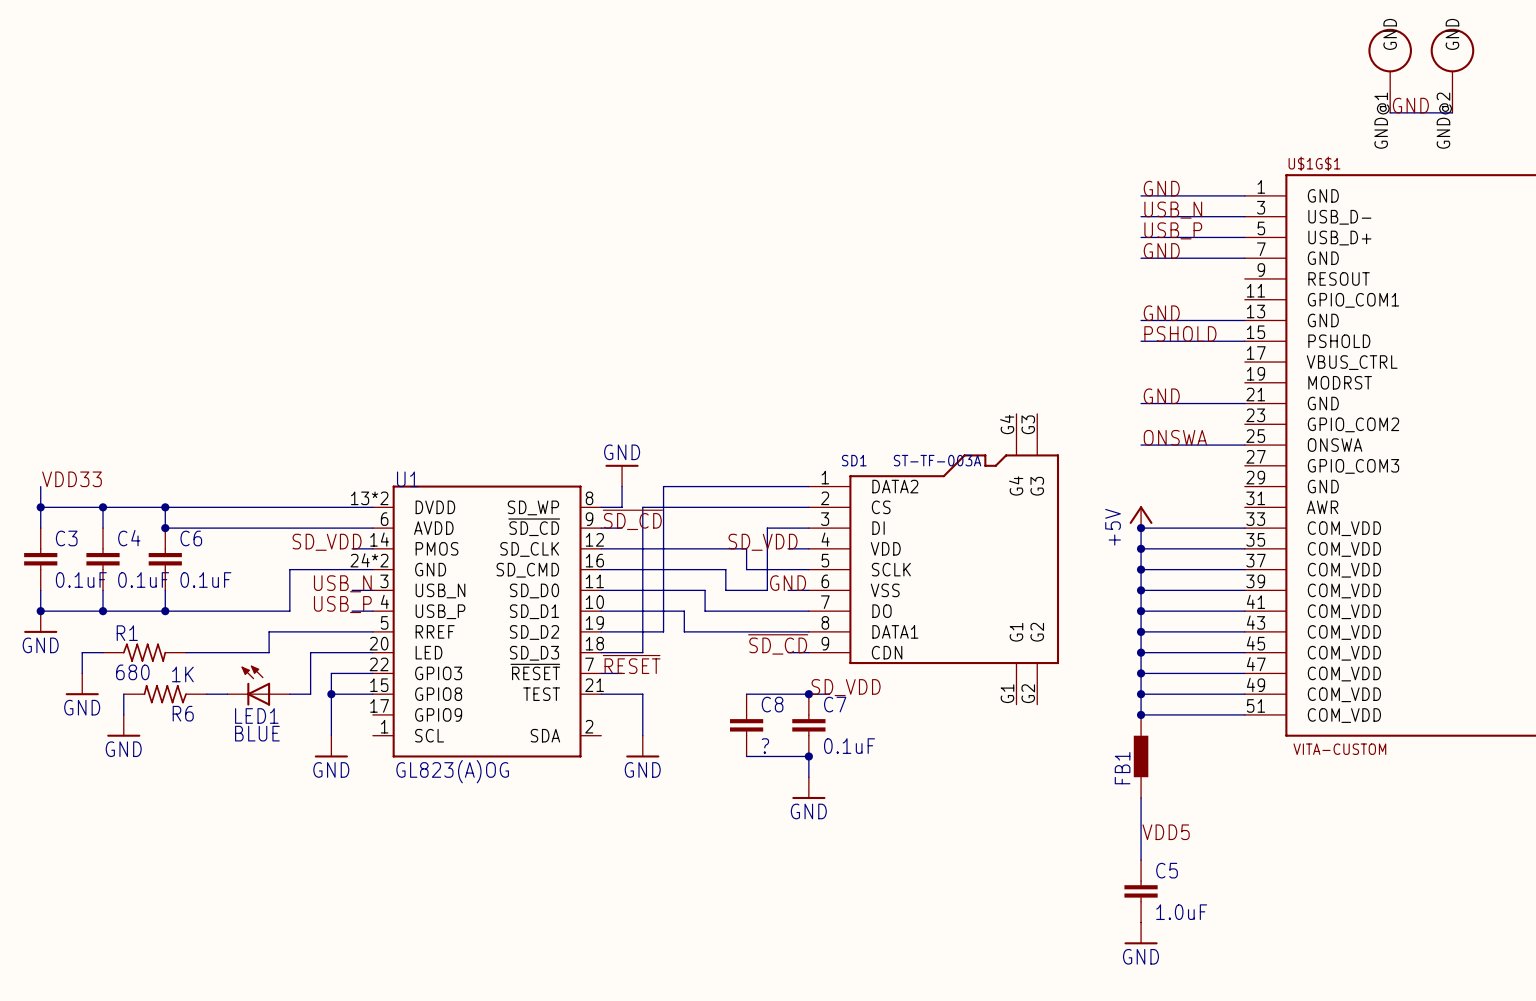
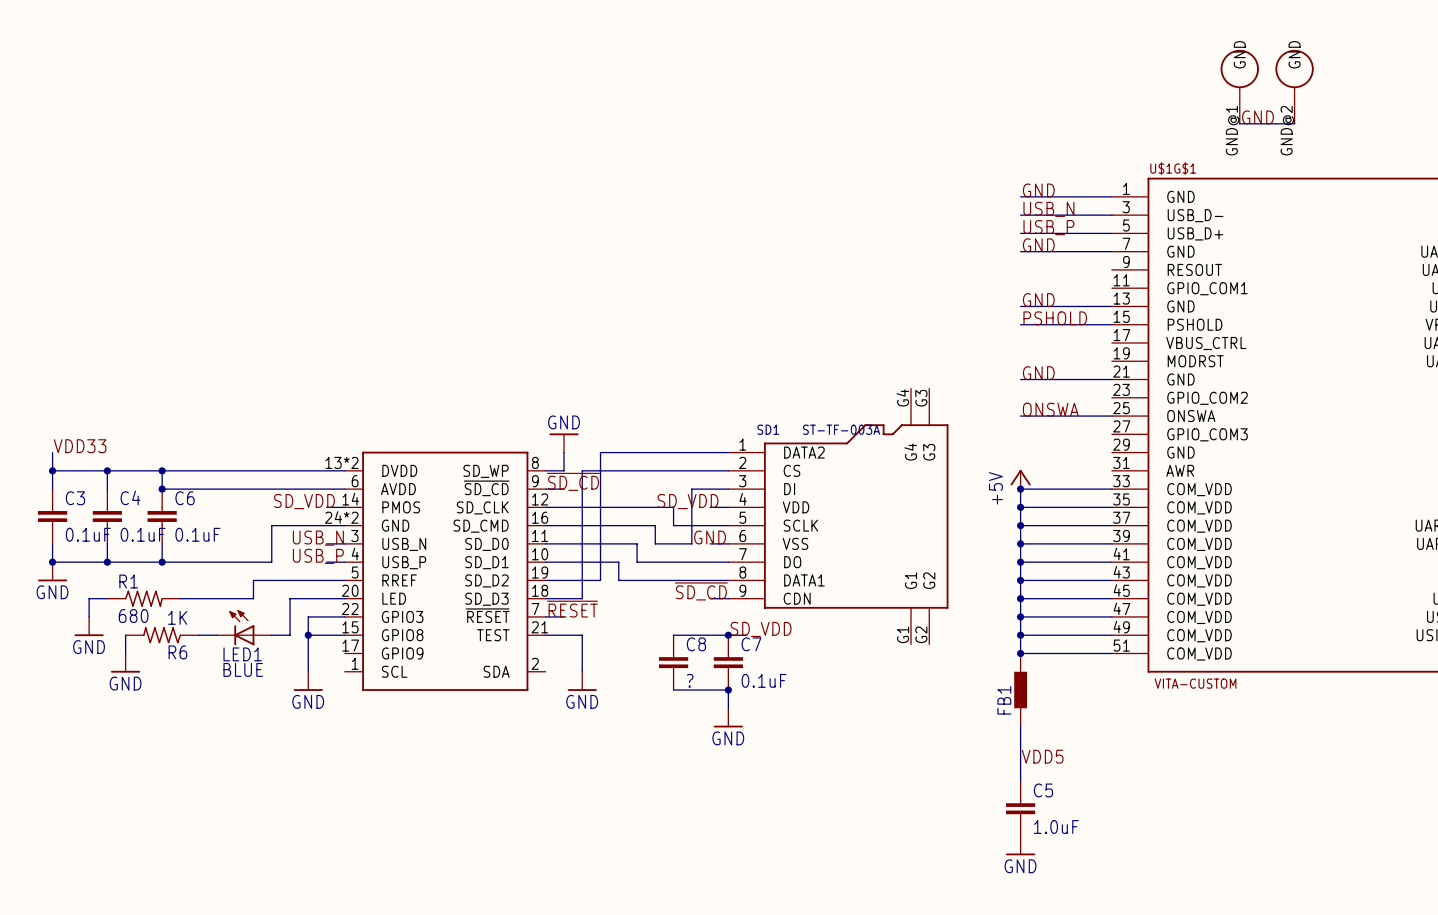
U1 name: U1 (407, 479) -> none
U1 value: GL823(A)OG (452, 771) -> none

